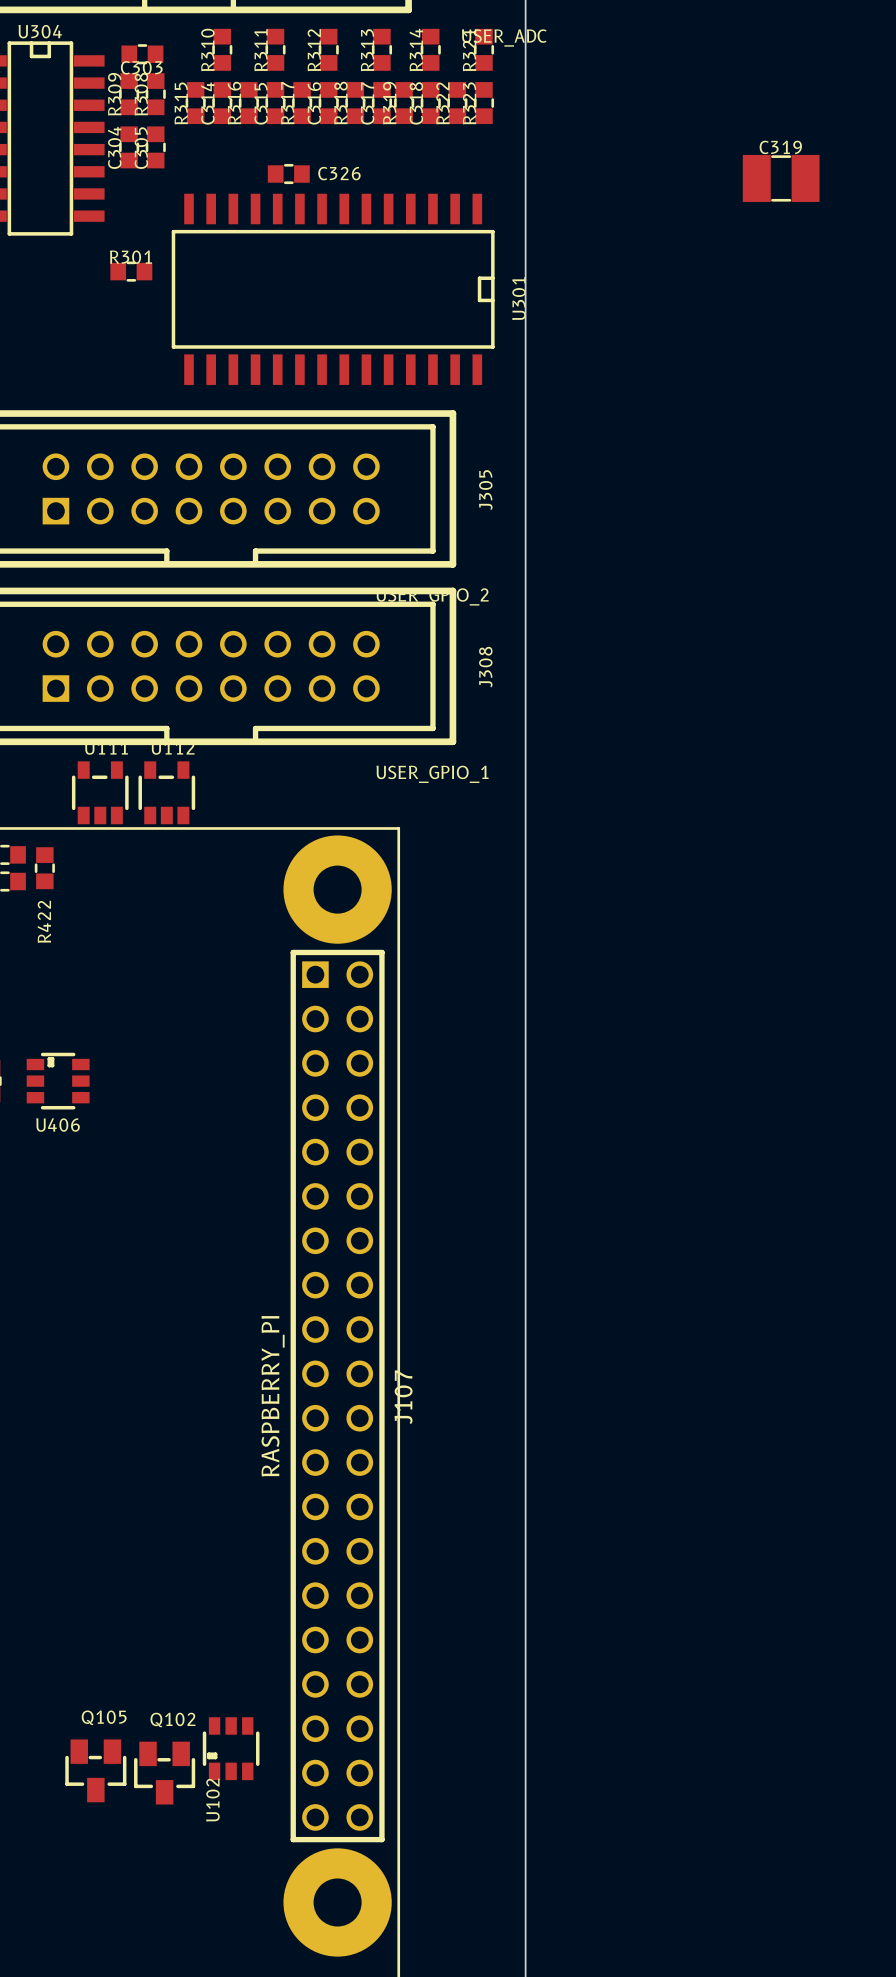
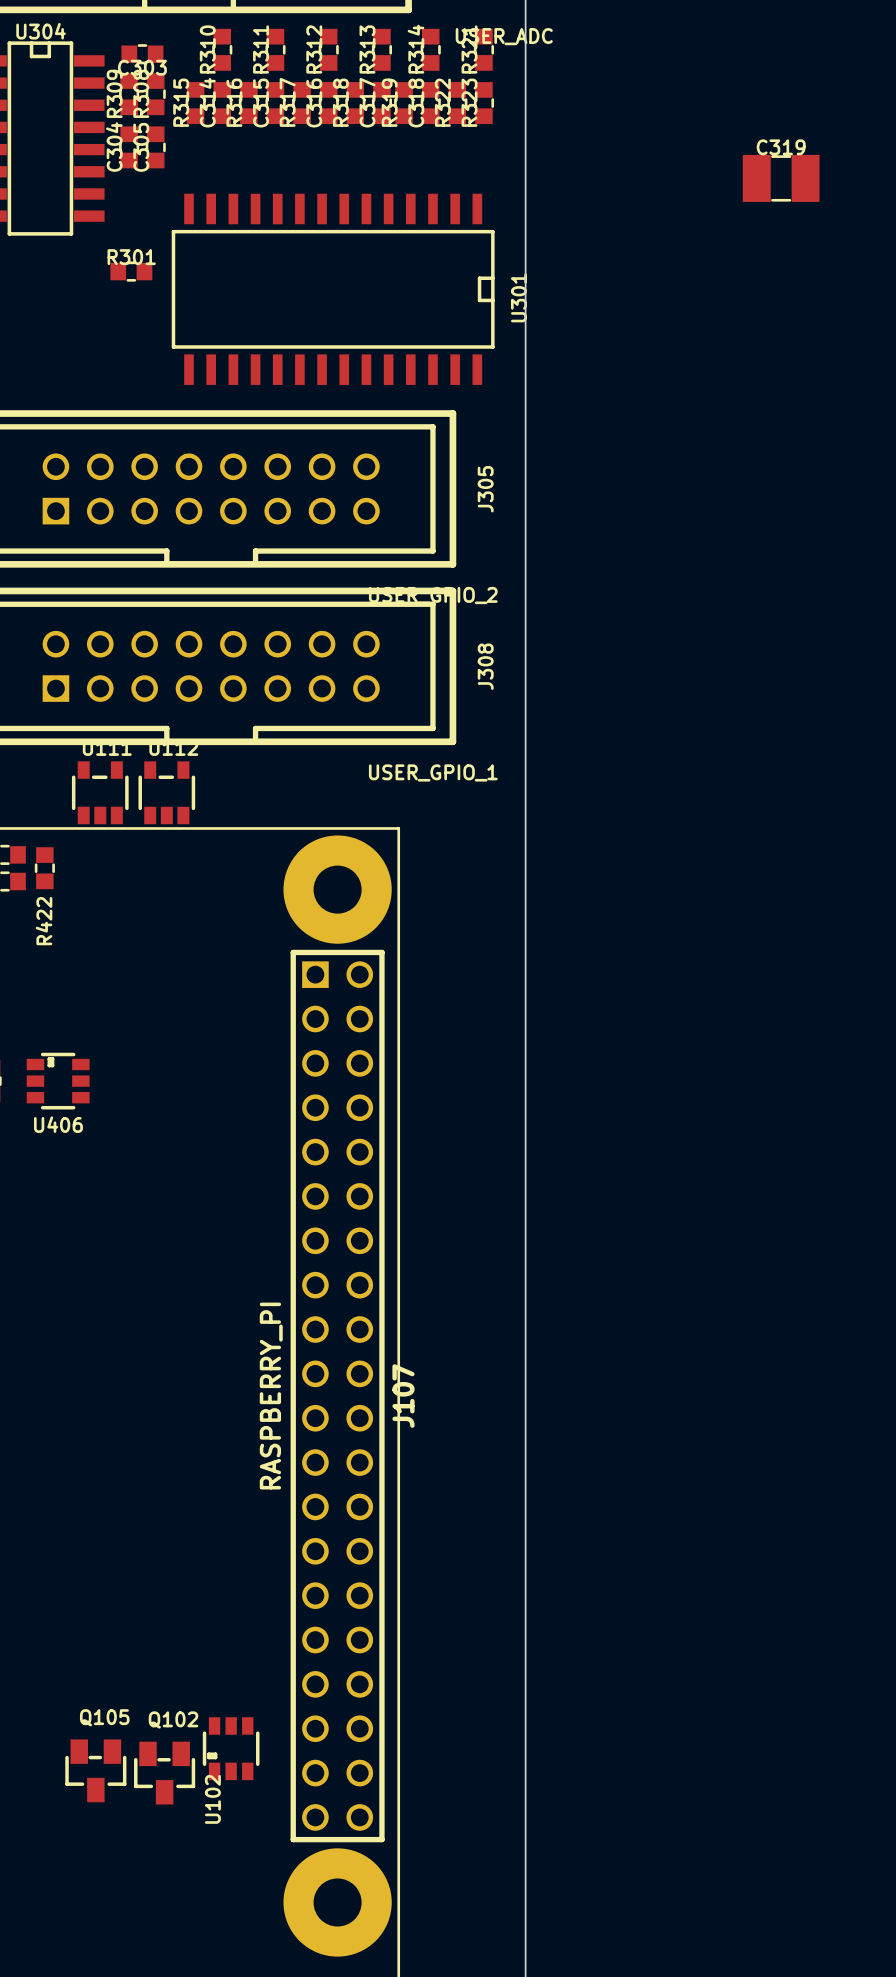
C326: (288, 174) -> none

